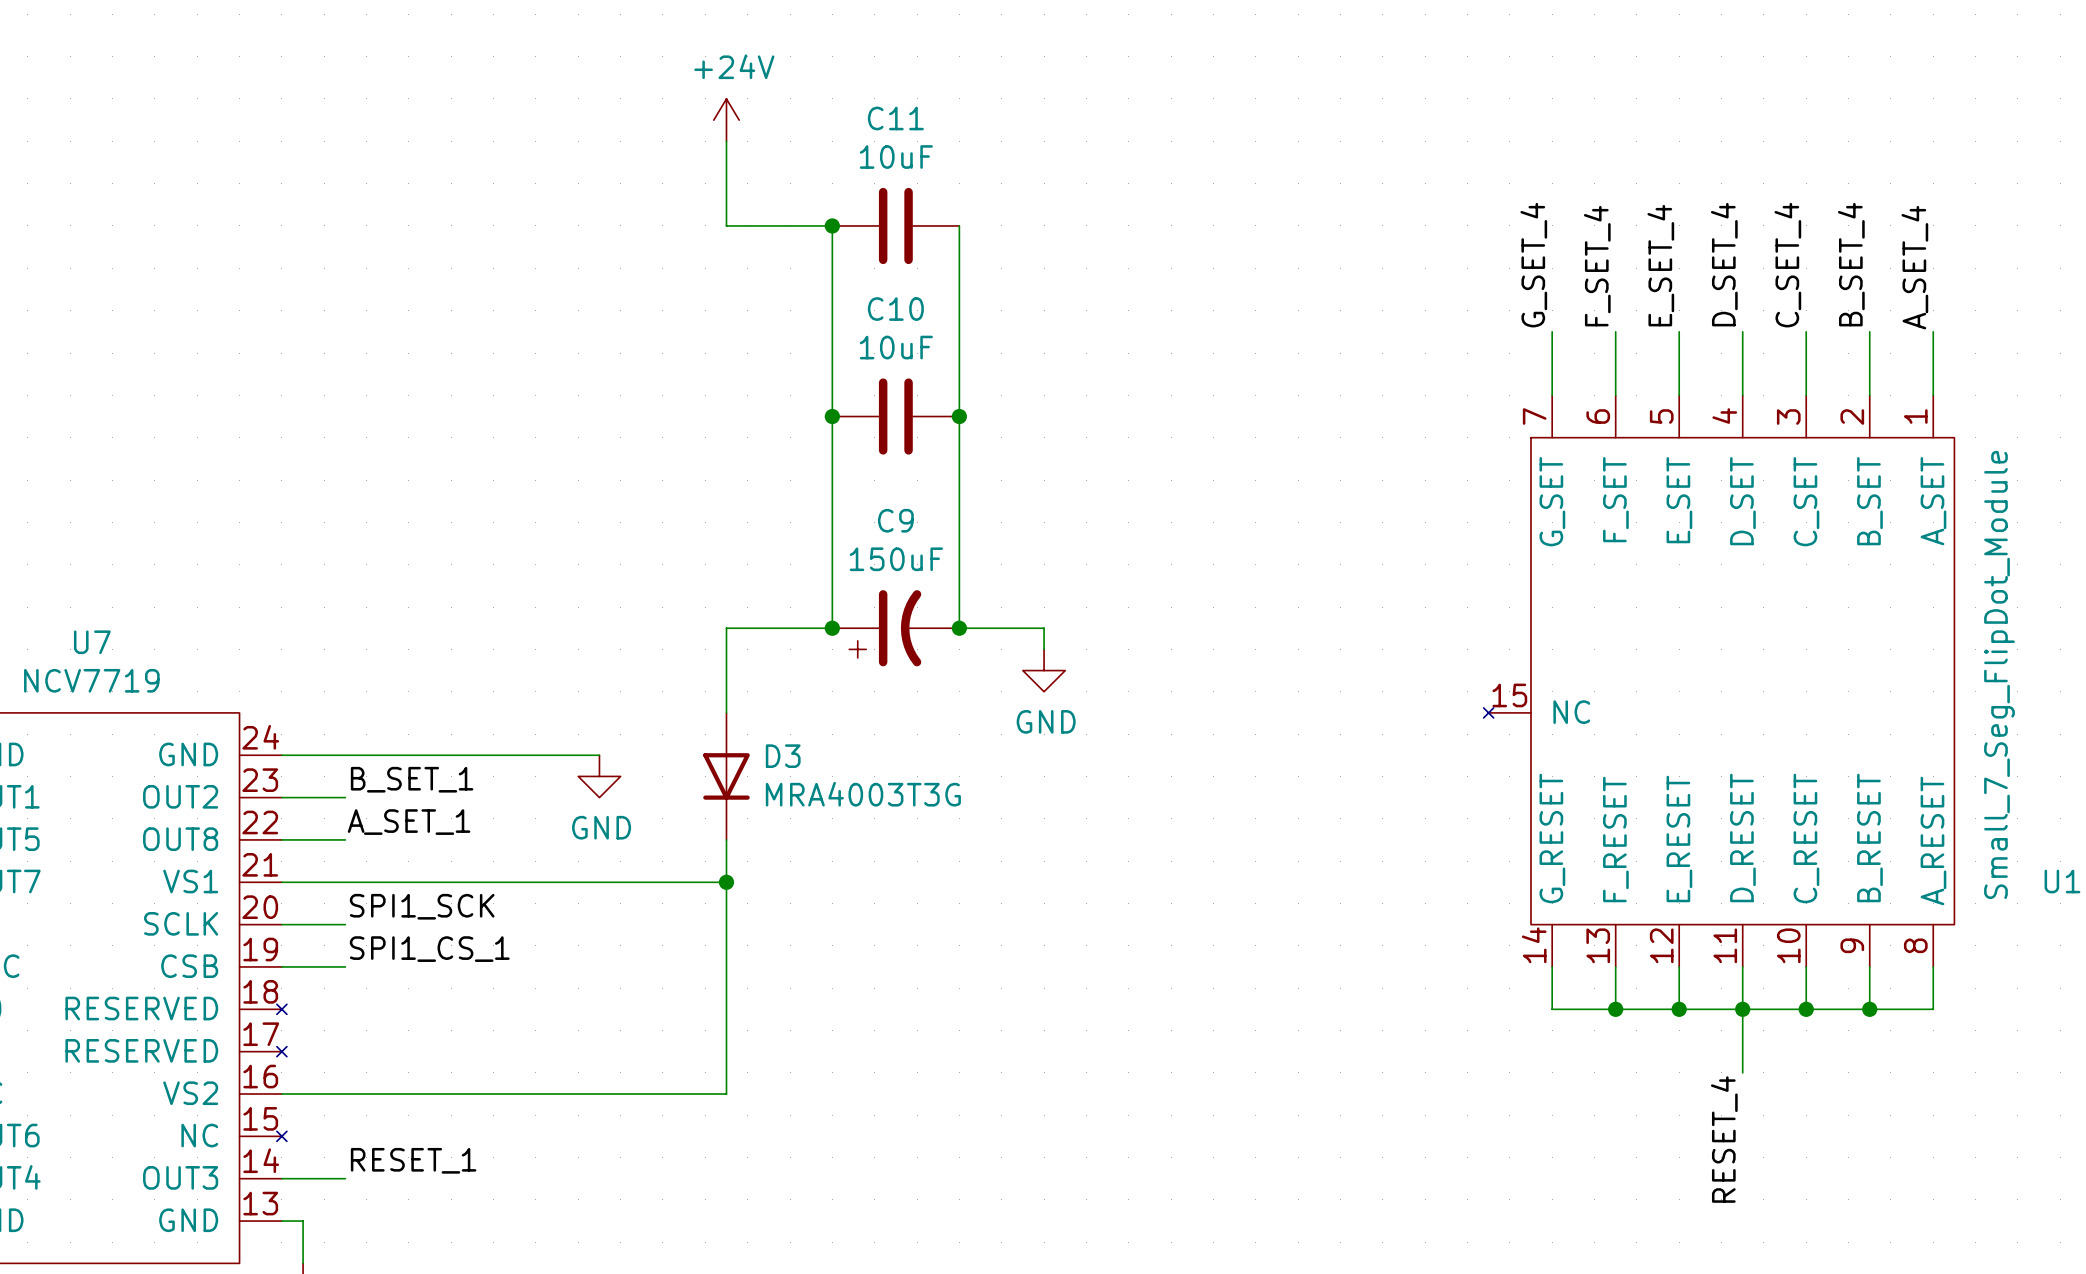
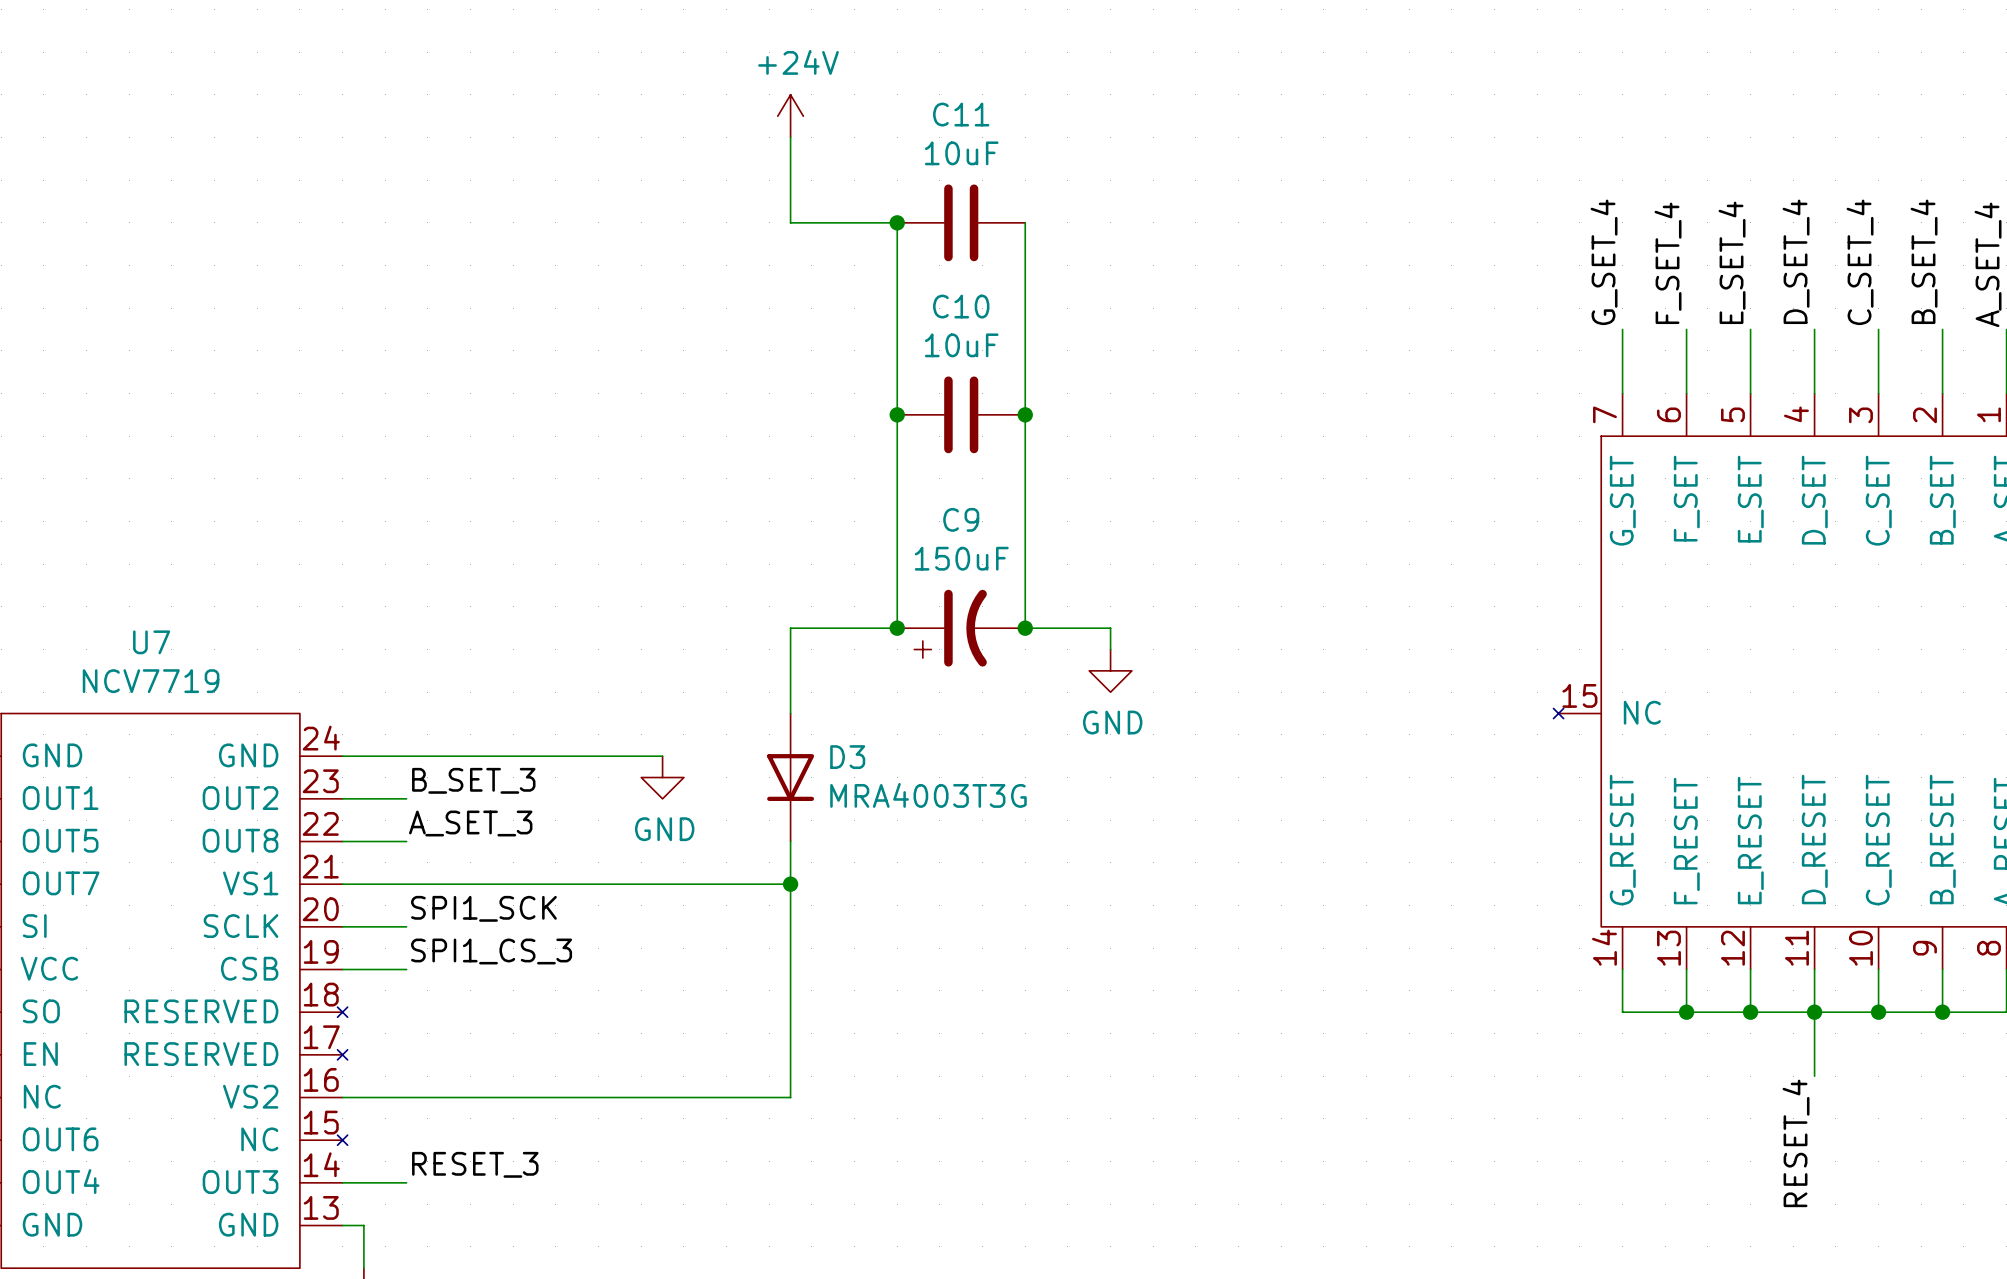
label: B_SET_1 (412, 779) -> B_SET_3 (473, 780)
label: A_SET_1 (409, 822) -> A_SET_3 (470, 823)
label: SPI1_CS_1 (429, 949) -> SPI1_CS_3 (491, 951)
label: RESET_1 (413, 1160) -> RESET_3 (475, 1164)

